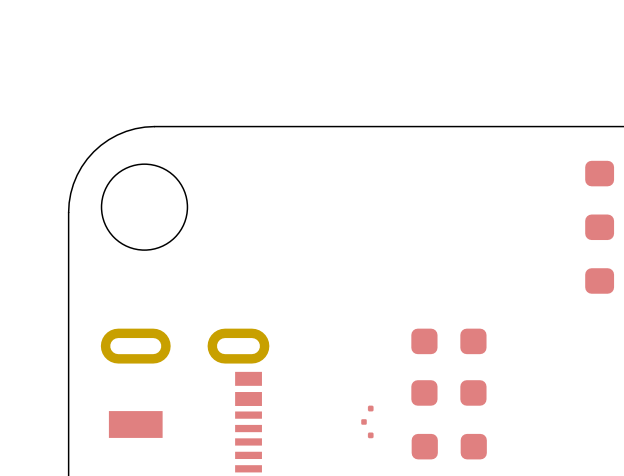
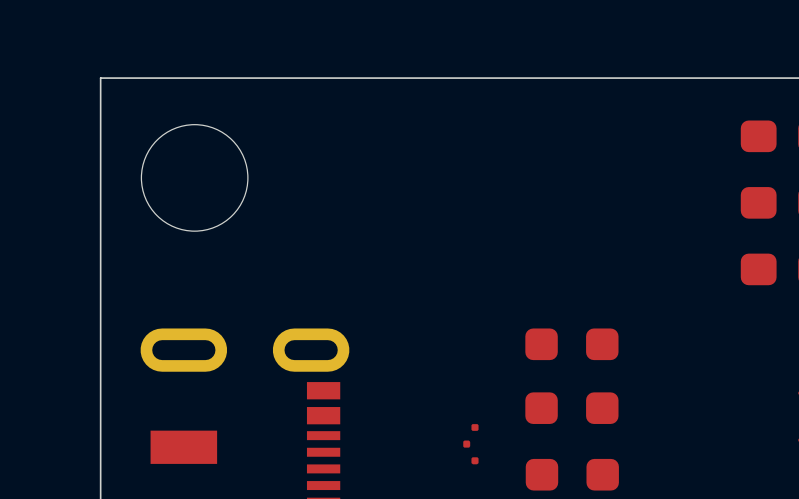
board edge: (154, 126) (135, 128) (117, 135) (93, 151) (81, 166) (73, 184) (68, 212) -> (207, 78) (100, 78) (100, 184)

